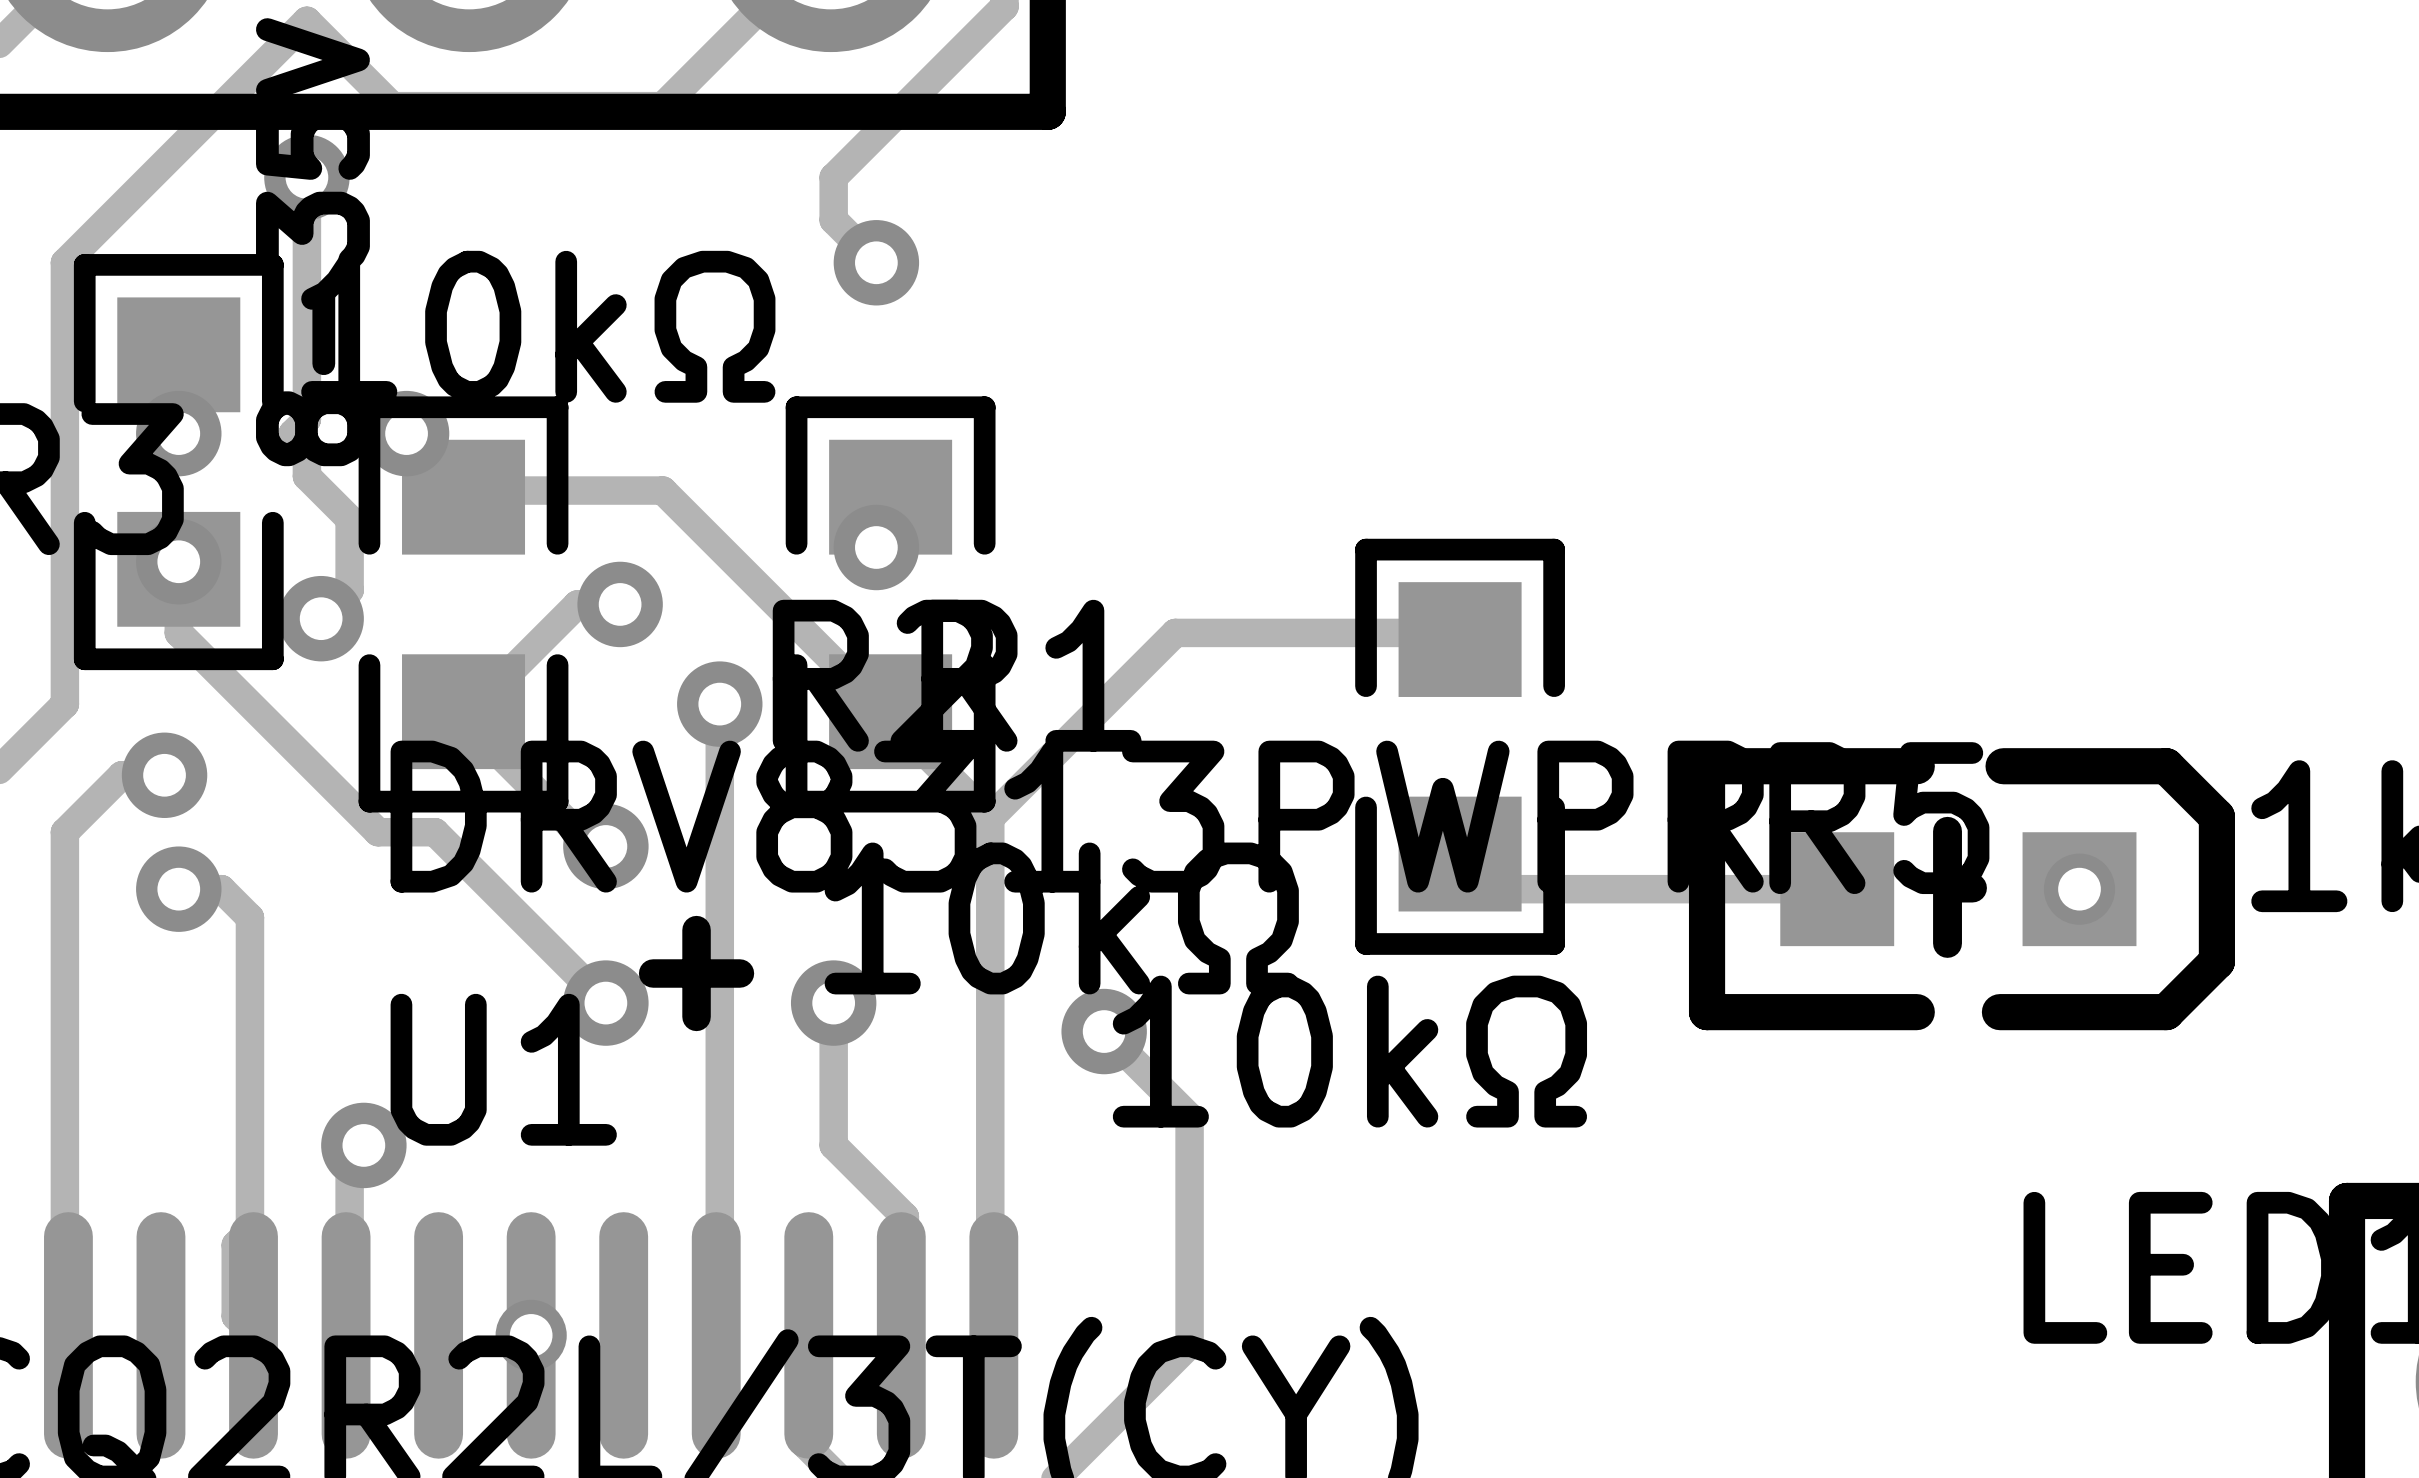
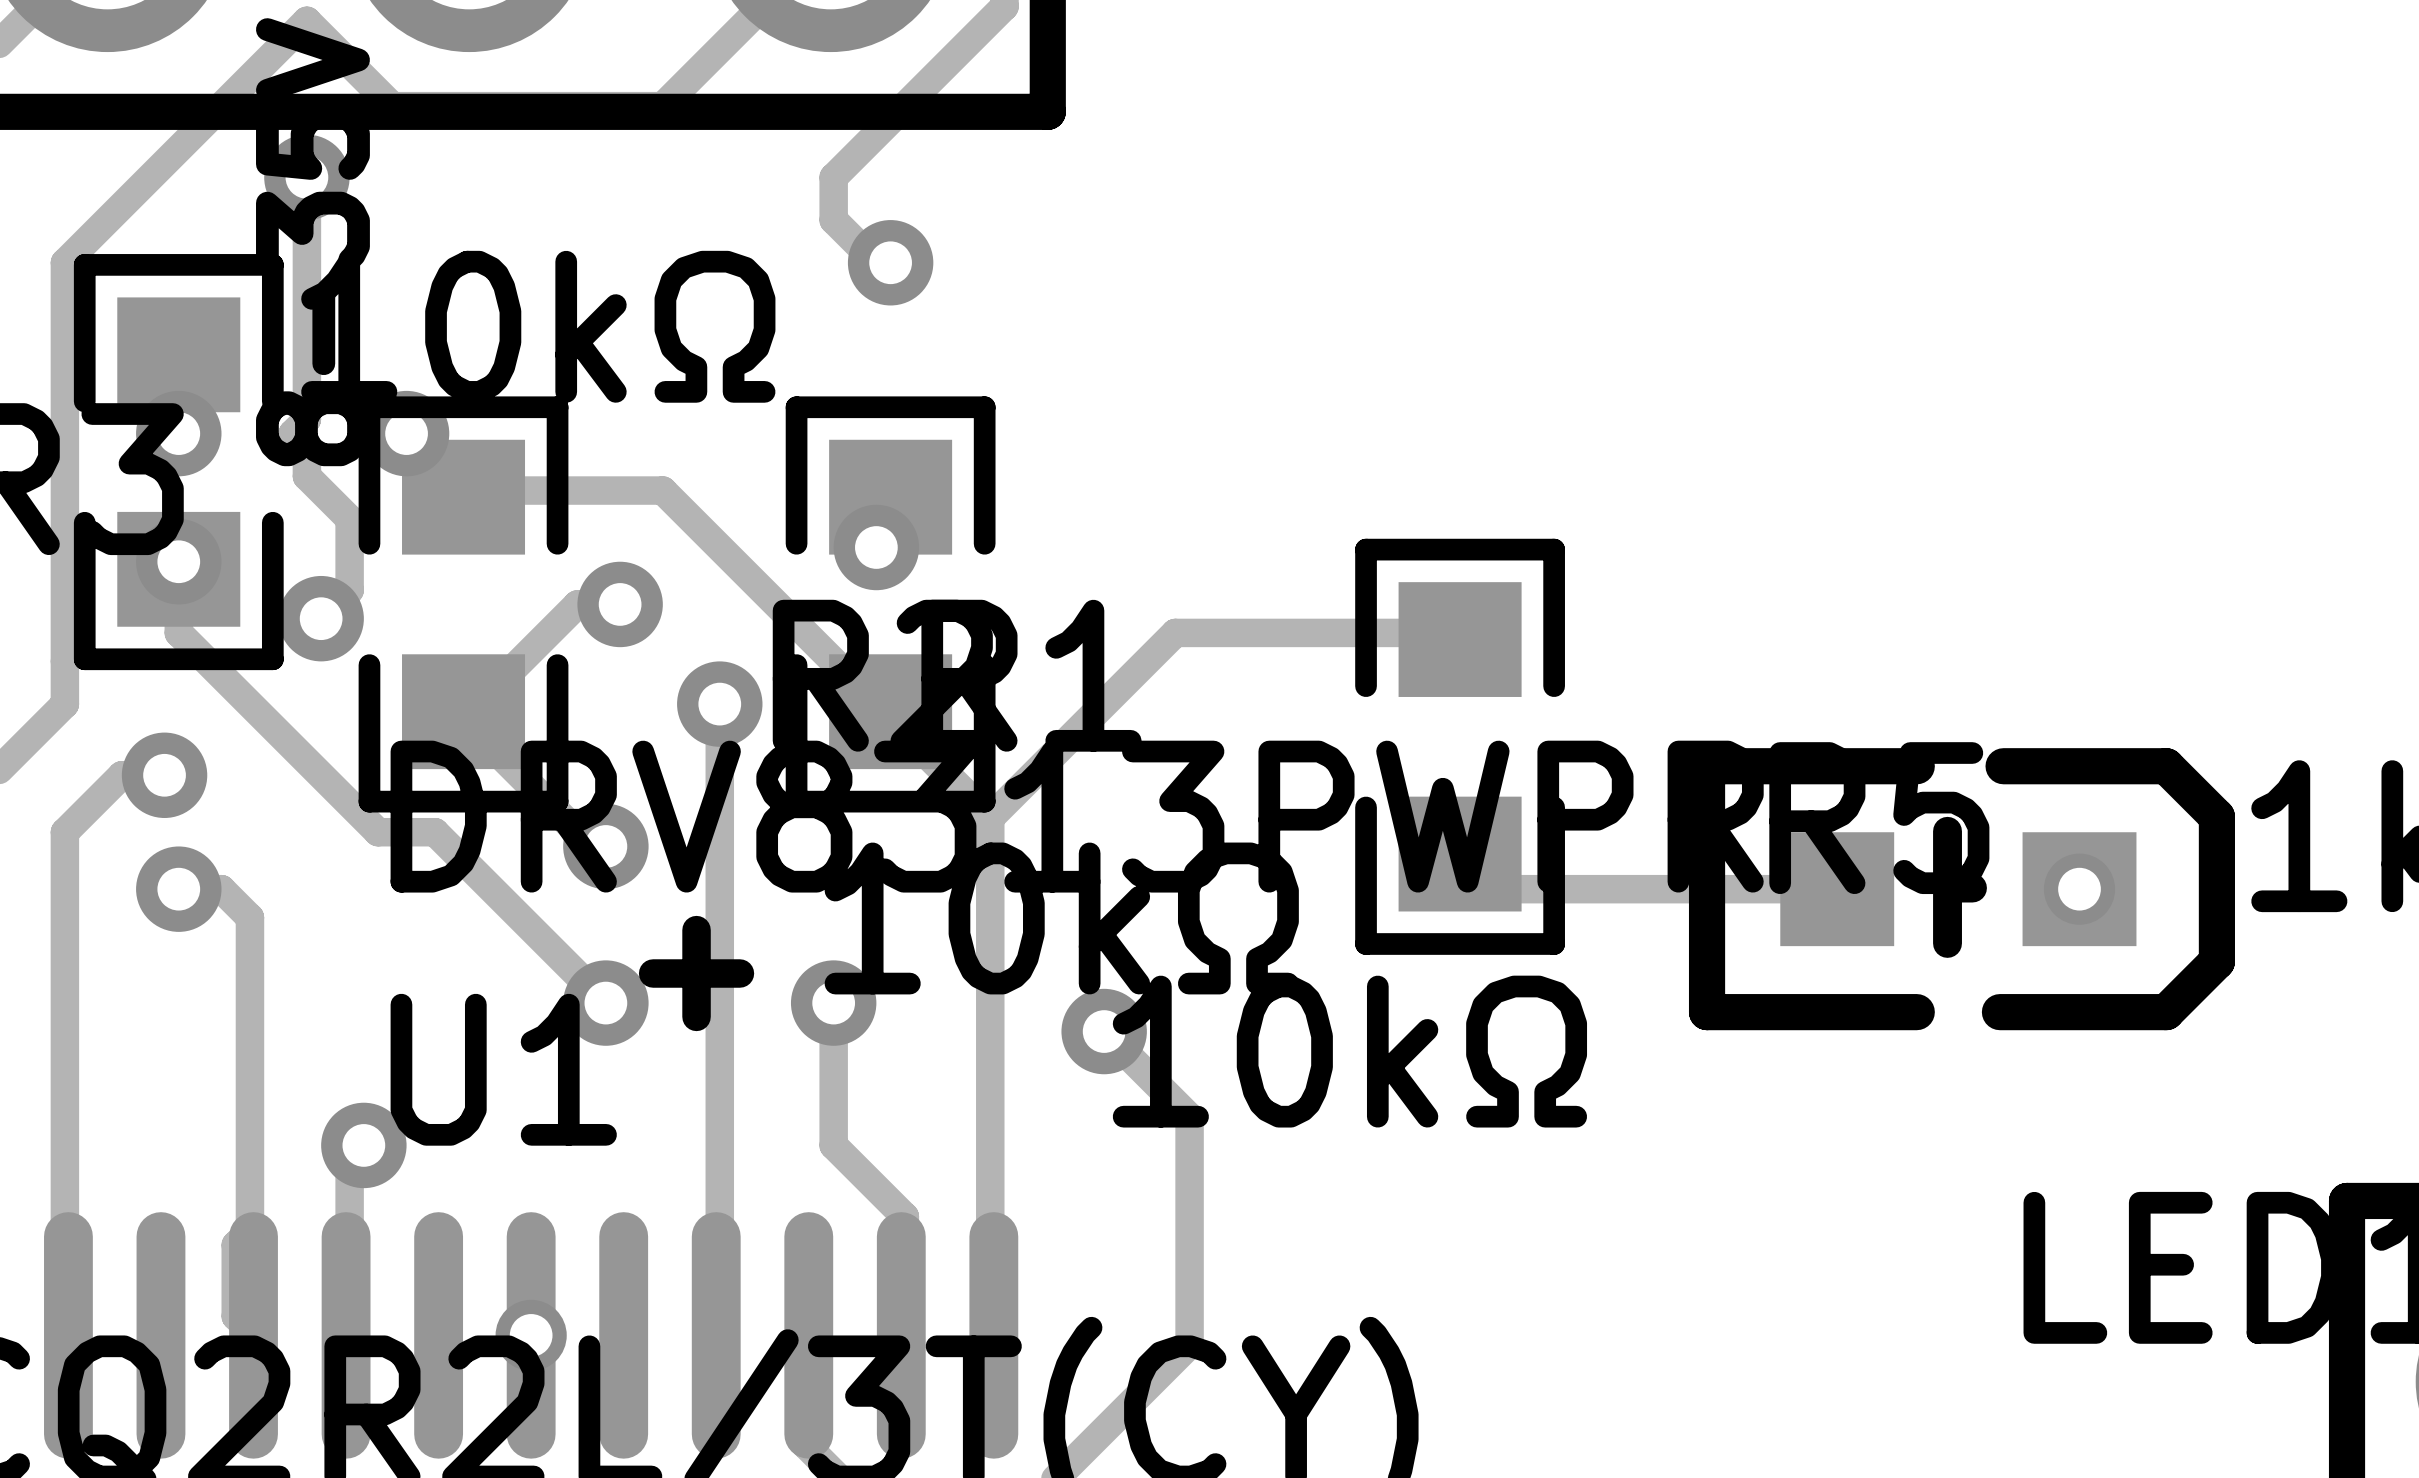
via position: (876, 262) -> (890, 262)

